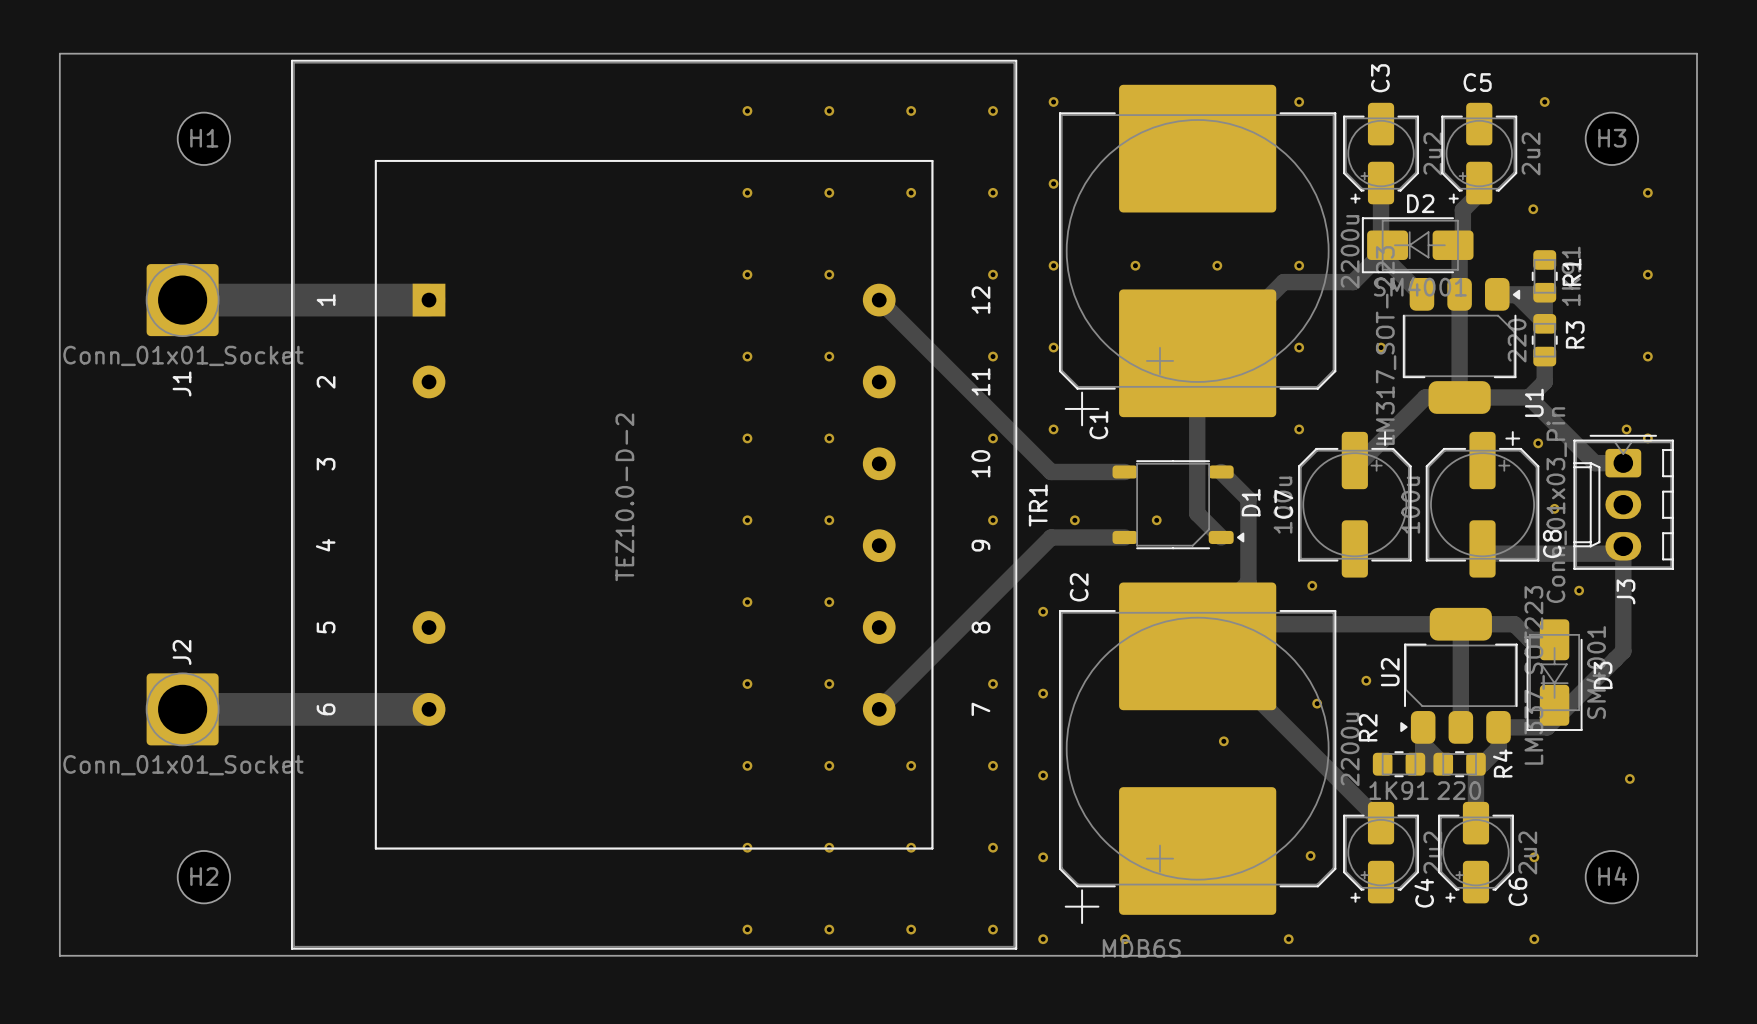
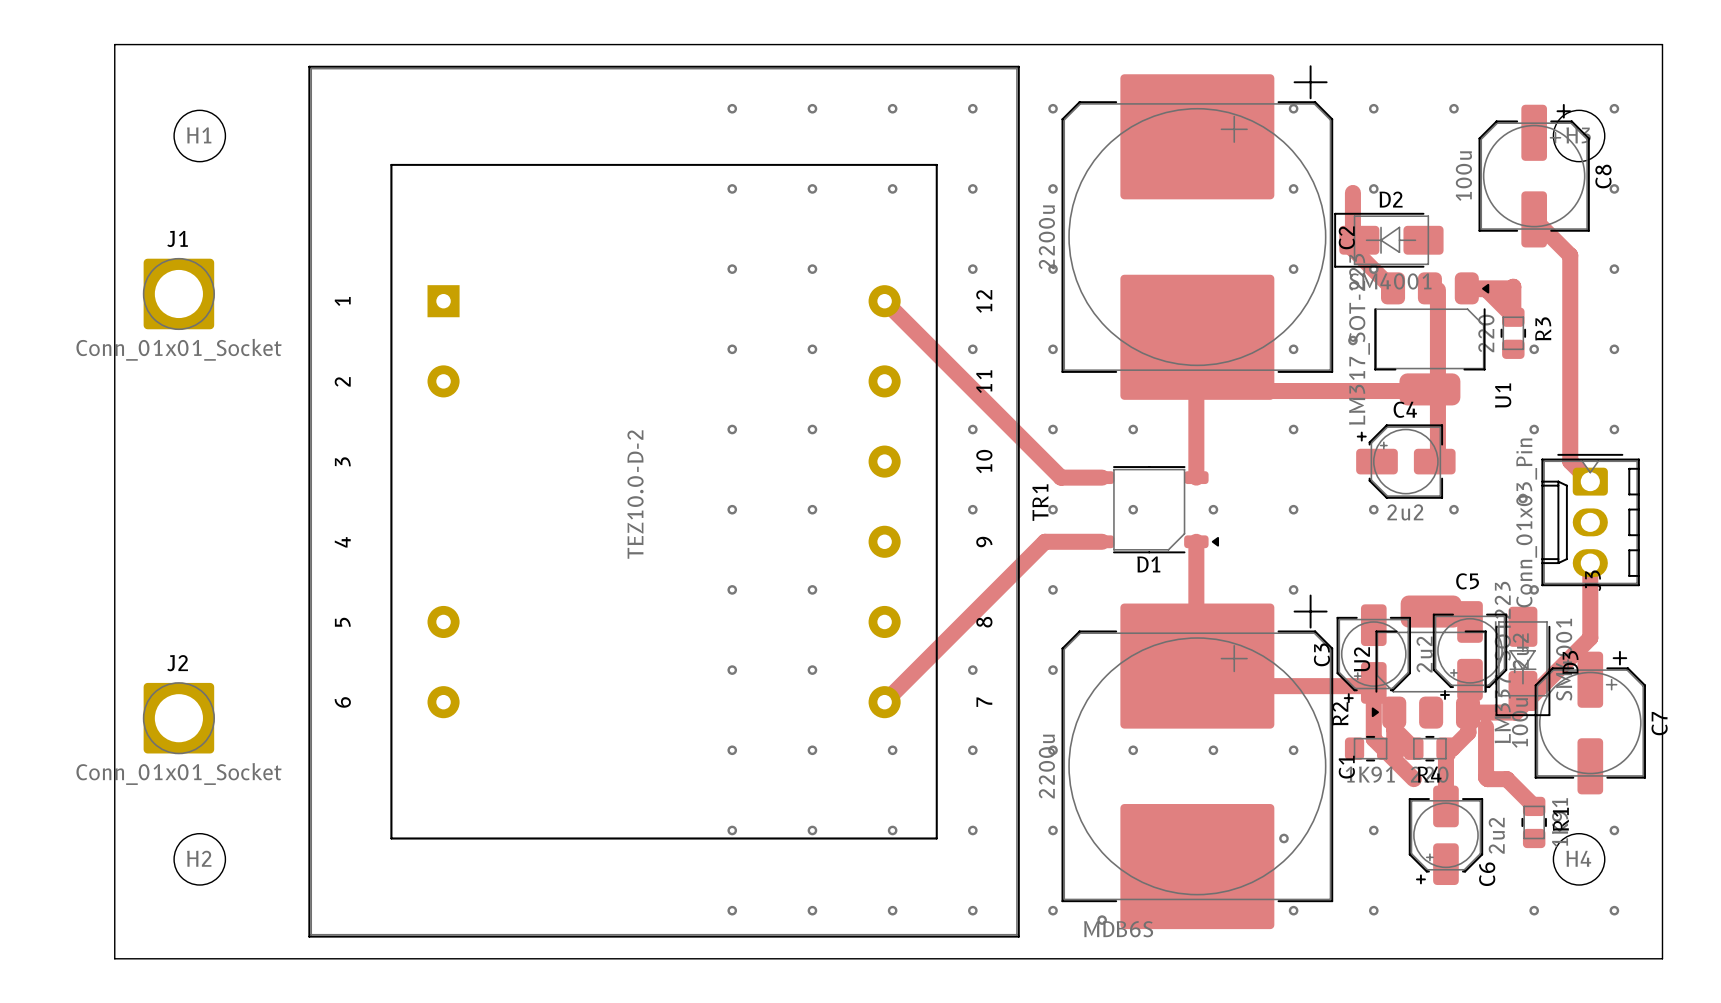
board edge: (1697, 53) (59, 53) (59, 955) (1697, 955) -> (1662, 52) (1662, 44) (114, 44) (114, 958) (1662, 958) (1662, 936)
C3 name position: C3 (1380, 78) -> C3 (1321, 654)
via position: (1053, 101) -> (1053, 108)
via position: (1299, 101) -> (1293, 108)
via: (1544, 101) -> none
via: none -> (1373, 108)
via: none -> (1453, 108)
via: none -> (1614, 108)
C3 position: (1381, 153) -> (1373, 654)
C5 position: (1479, 153) -> (1470, 650)
via position: (1053, 183) -> (1053, 188)
via: none -> (1293, 188)
via: none -> (1373, 188)
track: (1479, 193) (1462, 210) (1462, 241) (1459, 245) (1459, 398) -> none
via: (1533, 209) -> none
track: none -> (1534, 219) (1570, 255) (1570, 461) (1590, 481)
track: (1381, 254) (1353, 282) (1283, 282) (1197, 368) (1197, 513) (1221, 537) -> none
C1 rotation: 0° (1197, 255) -> 180° (1197, 761)
C1 position: (1197, 255) -> (1197, 761)
via position: (1053, 265) -> (1053, 269)
via: (1135, 265) -> none
via: (1217, 265) -> none
via position: (1299, 265) -> (1293, 269)
via: none -> (1373, 269)
R1 position: (1544, 276) -> (1534, 822)
track: none -> (1437, 289) (1437, 461) (1434, 461)
track: (182, 300) (429, 300) -> none
track: (879, 300) (1051, 471) (1125, 471) -> none
track: none -> (884, 301) (1061, 477) (1102, 477)
track: none -> (1197, 337) (1196, 477)
via position: (1053, 347) -> (1053, 349)
via position: (1299, 347) -> (1293, 349)
track: (1544, 356) (1544, 381) (1529, 397) -> none
via: none -> (1534, 349)
J1 name rotation: 0° (182, 383) -> 90° clockwise (177, 238)
J1 name position: J1 (182, 383) -> J1 (177, 238)
track: (1529, 397) (1425, 397) (1354, 467) -> none
track: (1529, 397) (1594, 463) (1623, 463) -> none
track: none -> (1251, 391) (1437, 391)
C1 name position: C1 (1098, 425) -> C1 (1346, 767)
via position: (1053, 429) -> (1053, 429)
via position: (1299, 429) -> (1293, 429)
via: (1626, 429) -> none
via: none -> (1133, 429)
via position: (1538, 443) -> (1534, 429)
track: (1221, 471) (1248, 499) (1248, 582) (1190, 640) -> none
D1 name rotation: 0° (1251, 502) -> 90° clockwise (1148, 564)
D1 name position: D1 (1251, 502) -> D1 (1148, 564)
J3 position: (1623, 502) -> (1590, 520)
TR1 position: (654, 504) -> (664, 501)
D1 position: (1178, 504) -> (1154, 509)
C7 name position: C7 (1283, 504) -> C7 (1659, 723)
C7 position: (1354, 504) -> (1590, 722)
C8 position: (1482, 504) -> (1534, 175)
via: none -> (1213, 509)
via: none -> (1293, 509)
via: none -> (1373, 509)
via: none -> (1453, 509)
track: (1125, 537) (1051, 537) (879, 709) -> none
C8 name position: C8 (1552, 544) -> C8 (1603, 176)
track: none -> (1102, 541) (1044, 541) (884, 702)
track: none -> (1196, 541) (1196, 665) (1217, 686) (1370, 686) (1373, 682) (1373, 739) (1413, 779)
track: (1485, 553) (1623, 553) (1623, 574) -> none
via position: (1312, 585) -> (1293, 589)
C2 name position: C2 (1079, 587) -> C2 (1346, 237)
via position: (1579, 590) -> (1534, 589)
via position: (1043, 611) -> (1053, 589)
track: (1460, 624) (1460, 727) -> none
track: (1554, 639) (1530, 639) (1514, 624) (1215, 624) (1199, 640) (1381, 822) (1381, 826) -> none
J2 name rotation: 0° (182, 652) -> 90° clockwise (177, 663)
via: (1366, 680) -> none
via position: (1043, 693) -> (1053, 670)
via: (1317, 703) -> none
track: (182, 709) (429, 709) -> none
J2 position: (182, 709) -> (178, 718)
via position: (1223, 741) -> (1213, 750)
track: none -> (1486, 727) (1486, 777) (1506, 779) (1534, 806)
C2 rotation: 0° (1197, 753) -> 180° (1197, 232)
C2 position: (1197, 753) -> (1197, 232)
R4 name rotation: 0° (1502, 763) -> 90° clockwise (1429, 774)
R4 name position: R4 (1502, 763) -> R4 (1429, 774)
via: none -> (1133, 750)
via: none -> (1293, 750)
via position: (1043, 775) -> (1053, 750)
via: (1629, 778) -> none
via: none -> (1373, 830)
via: none -> (1614, 830)
C4 rotation: 0° (1381, 852) -> 90° clockwise (1405, 461)
C4 position: (1381, 852) -> (1405, 461)
via position: (1043, 857) -> (1053, 830)
via: (1534, 857) -> none
C4 name position: C4 (1424, 893) -> C4 (1405, 409)
via: none -> (1373, 910)
via: none -> (1614, 910)
via position: (1043, 939) -> (1053, 910)
via position: (1288, 939) -> (1293, 910)
via position: (1534, 939) -> (1534, 910)

